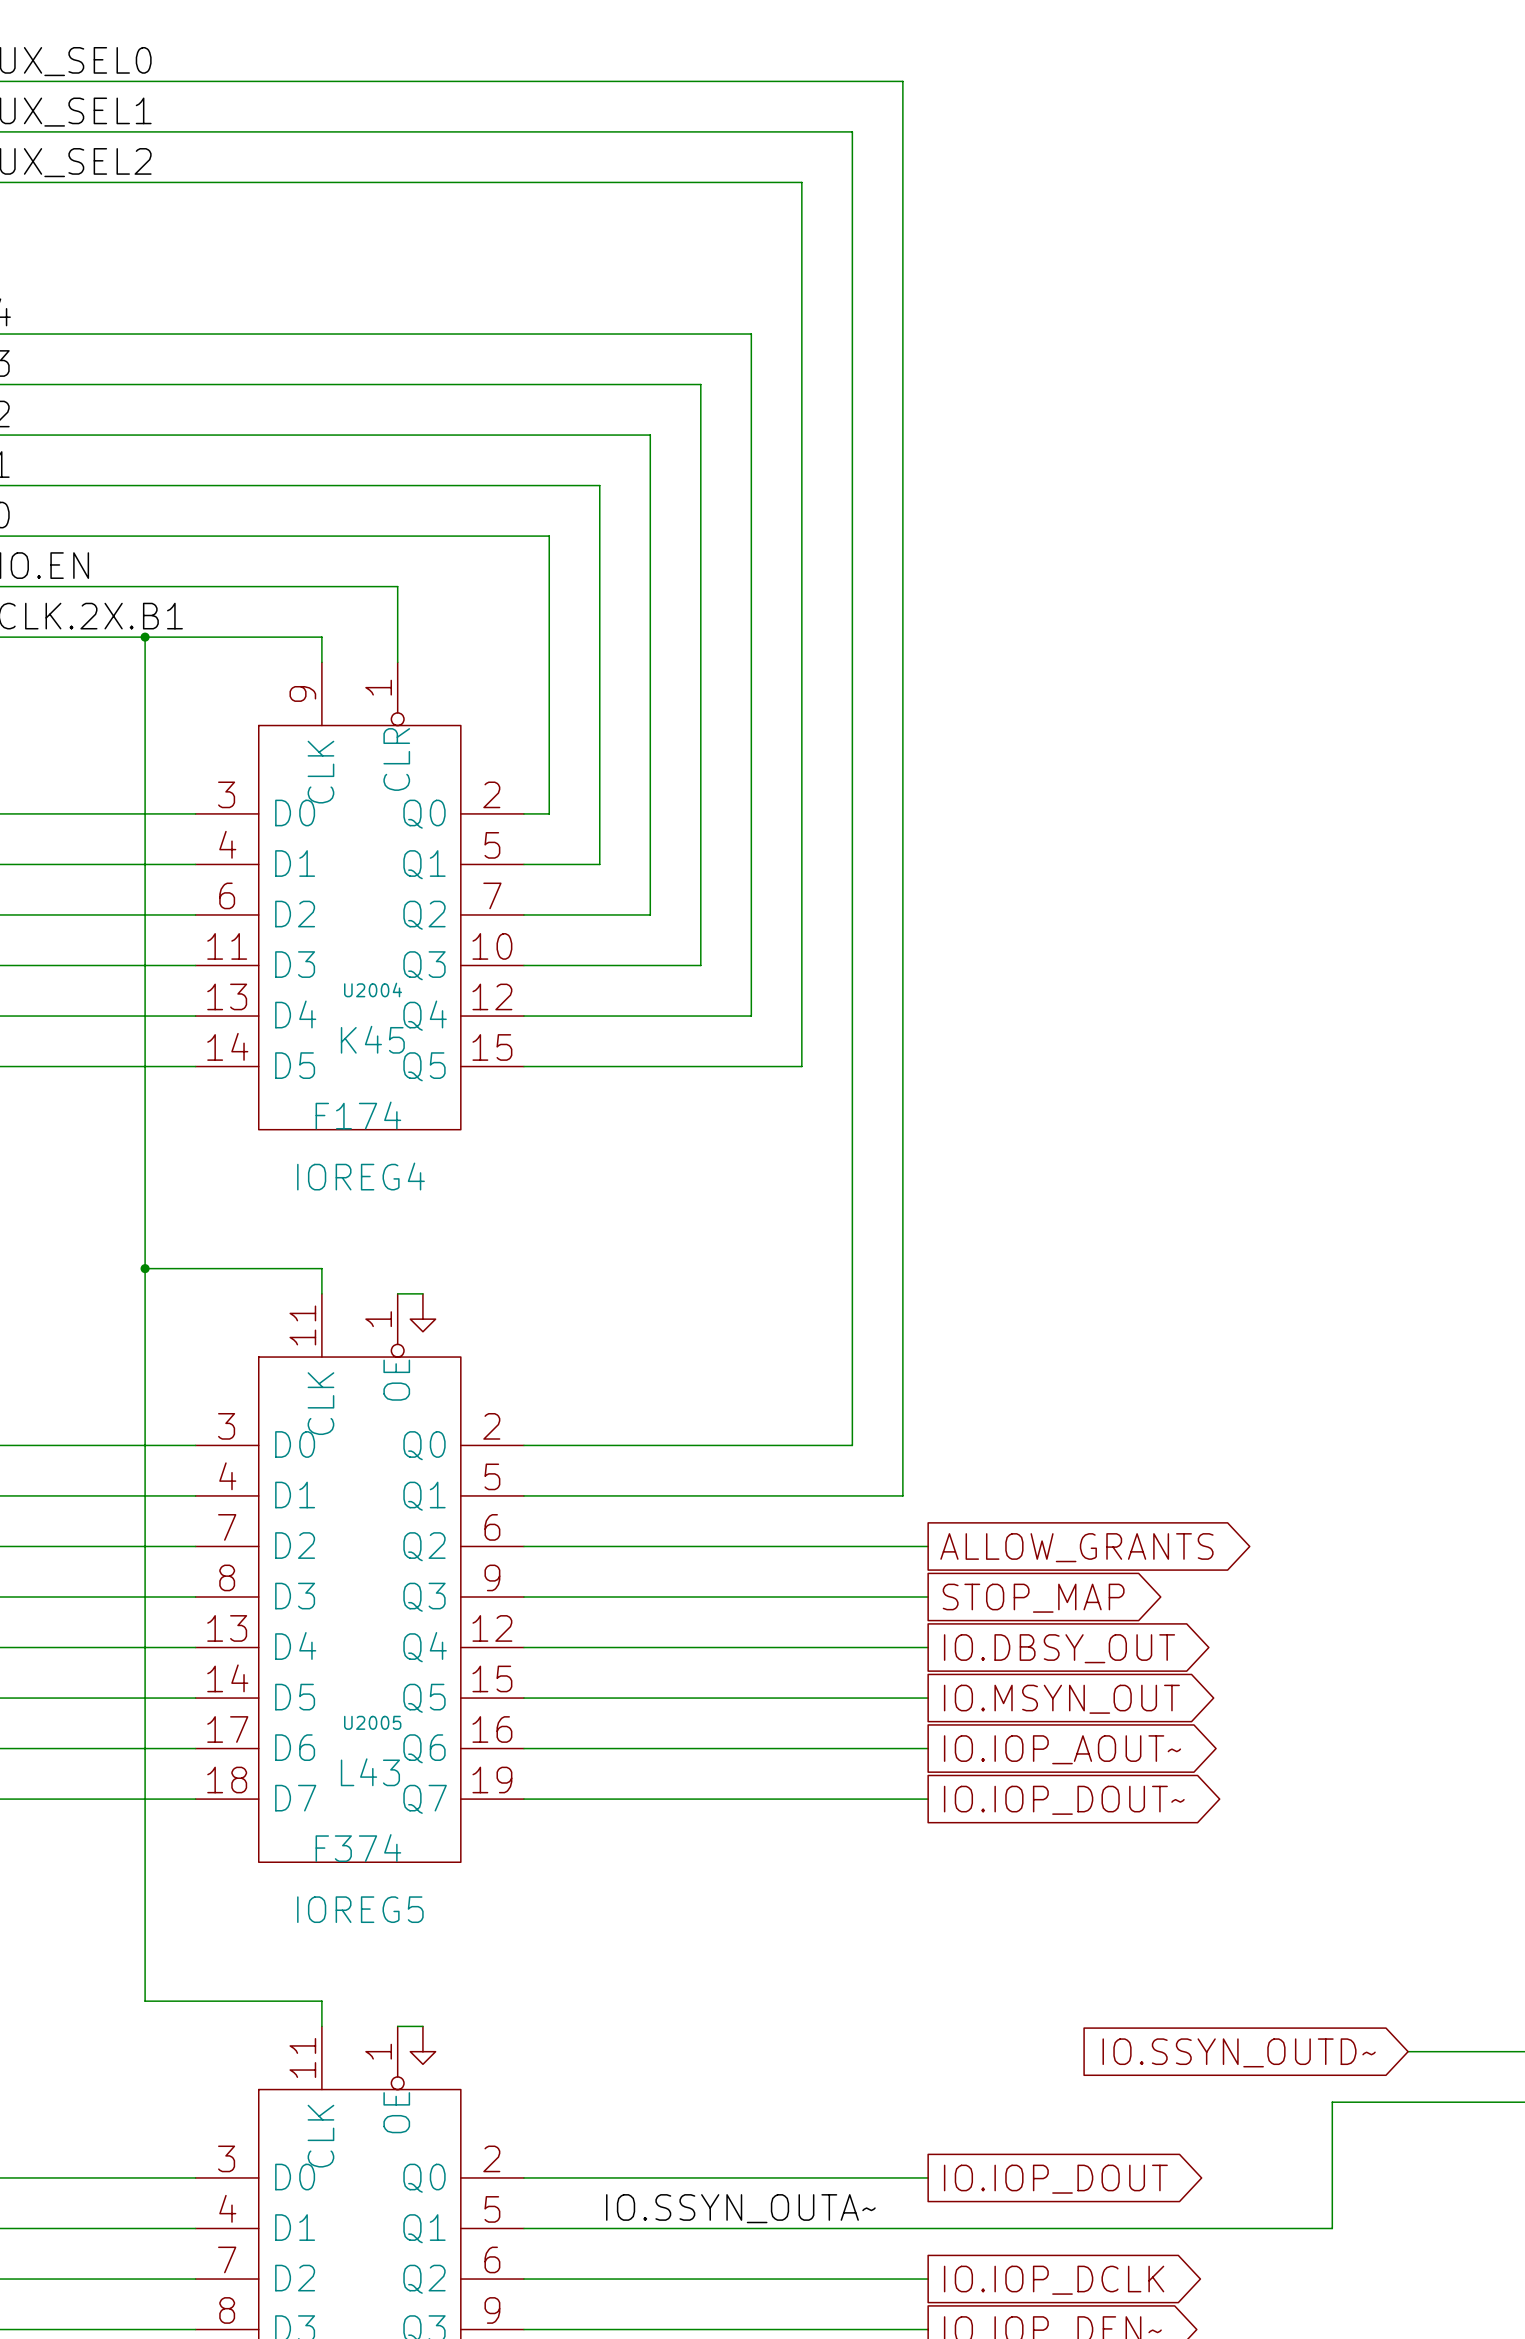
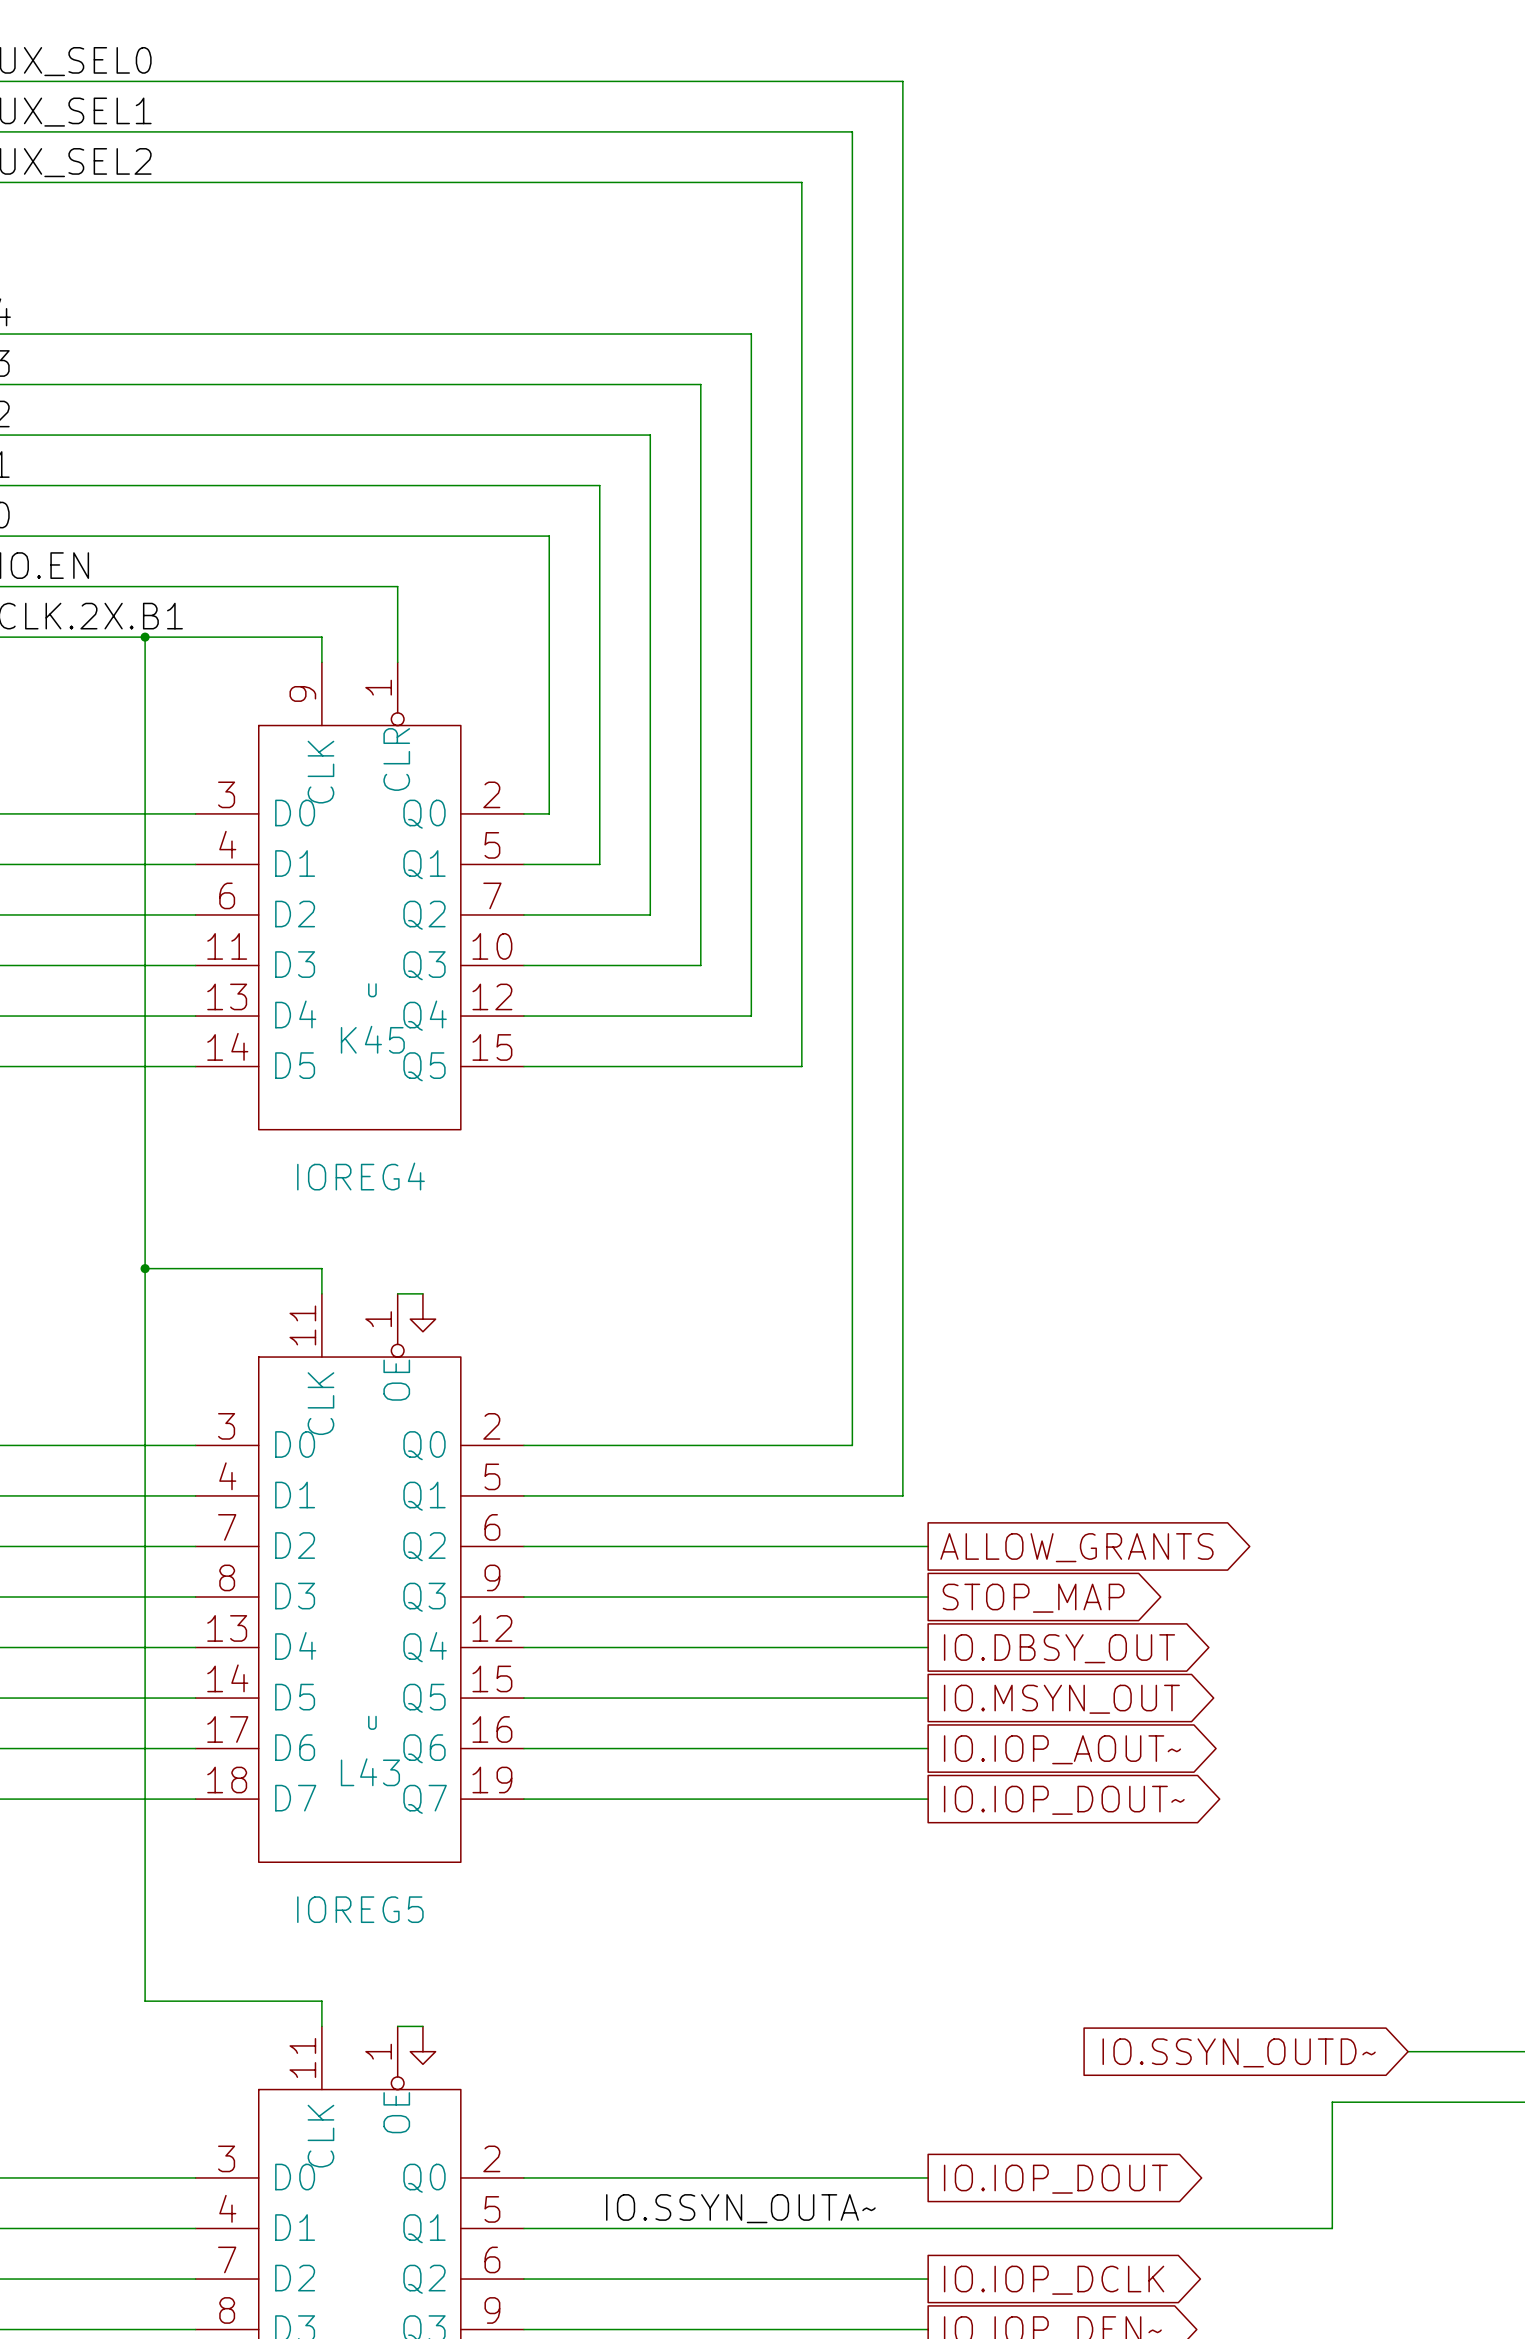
U2004 name: U2004 (373, 989) -> U (372, 990)
U2004 value: F174 (358, 1115) -> none
U2005 name: U2005 (372, 1722) -> U (372, 1722)
U2005 value: F374 (358, 1848) -> none

